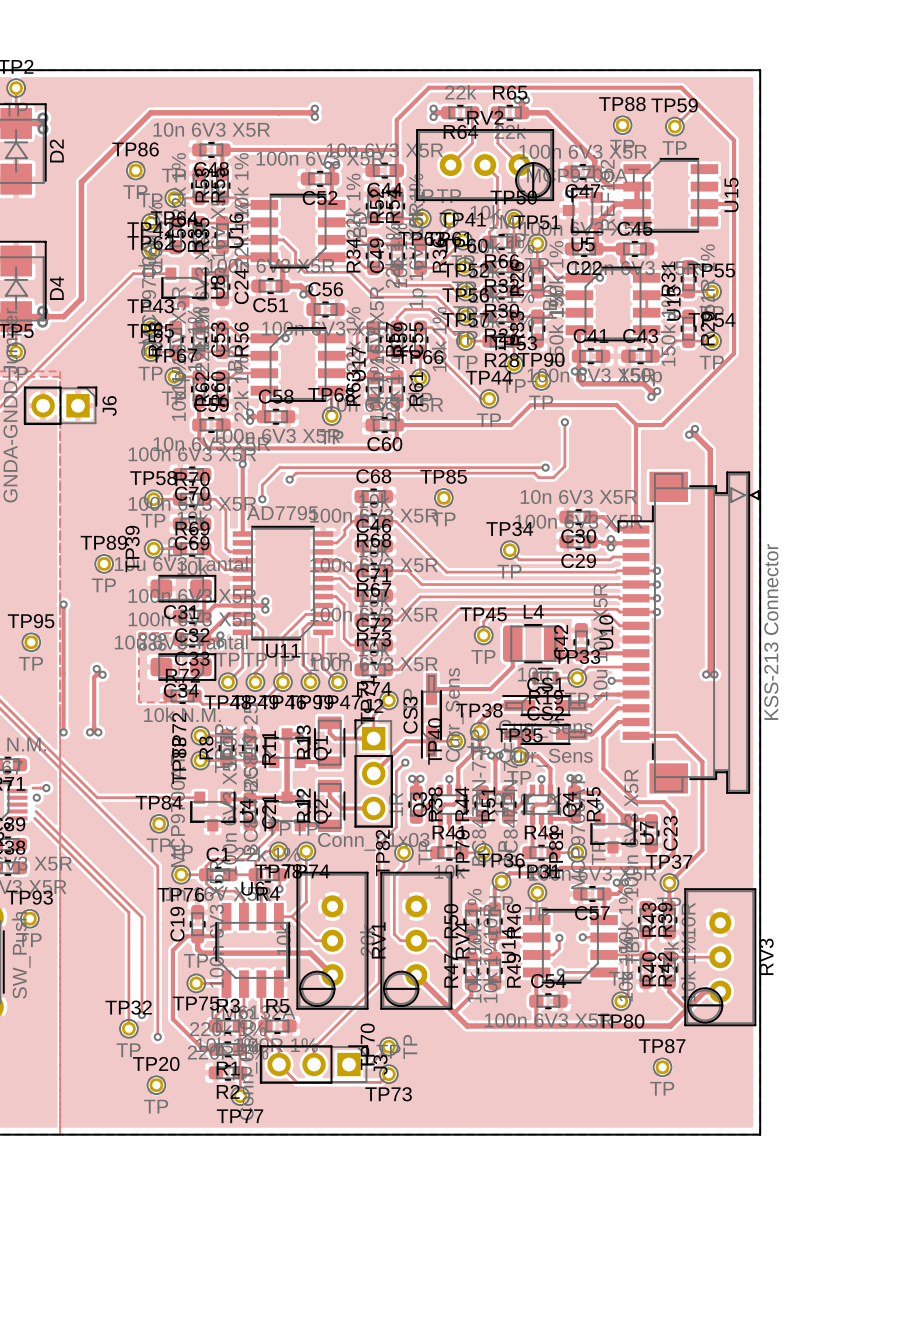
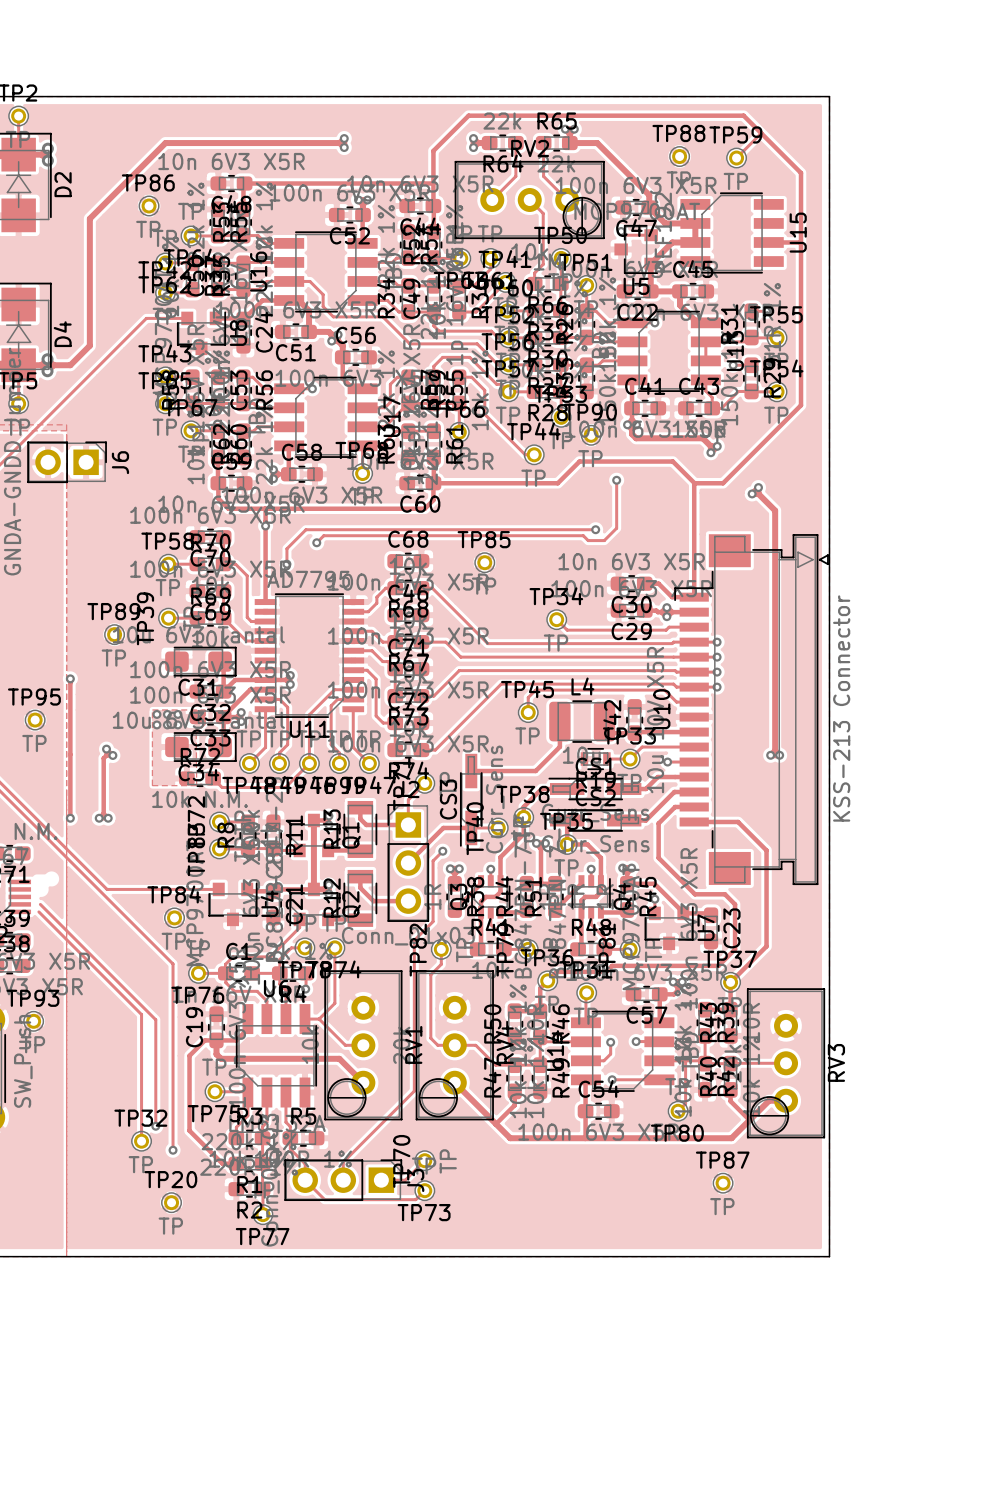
track: (32, 788) (46, 788) -> none
via: (46, 788) -> none
via: (36, 797) -> none

